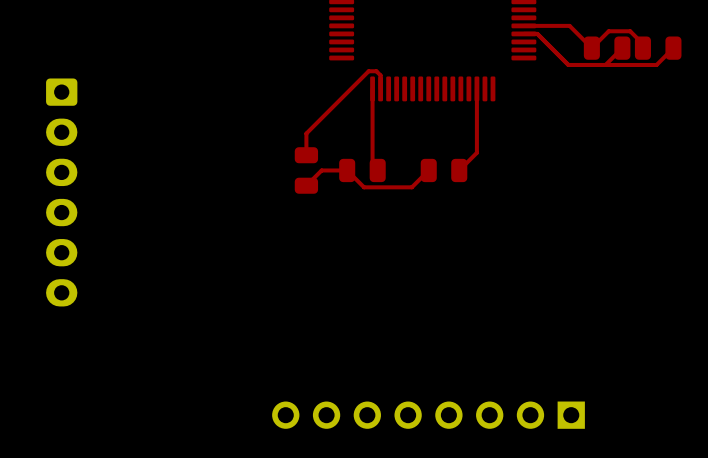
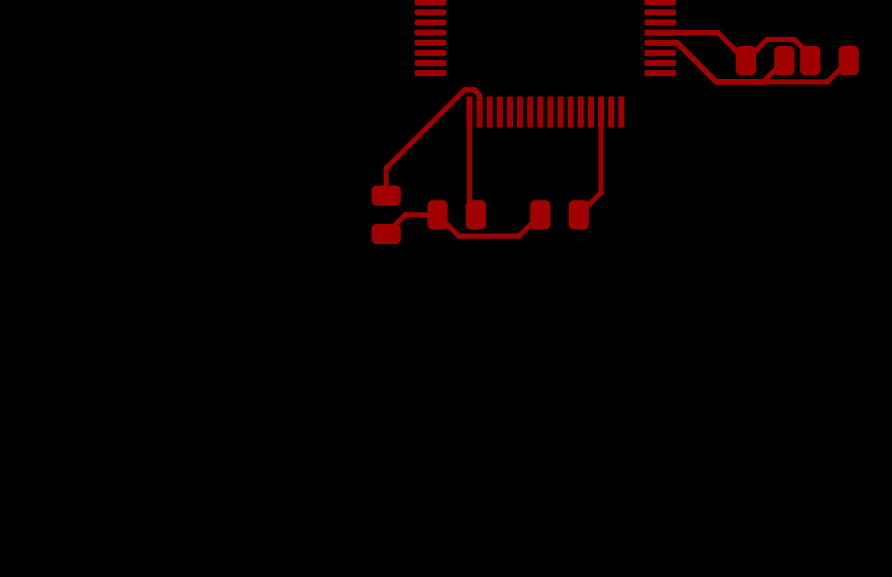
part: (61, 192) -> none
part: (428, 415) -> none

